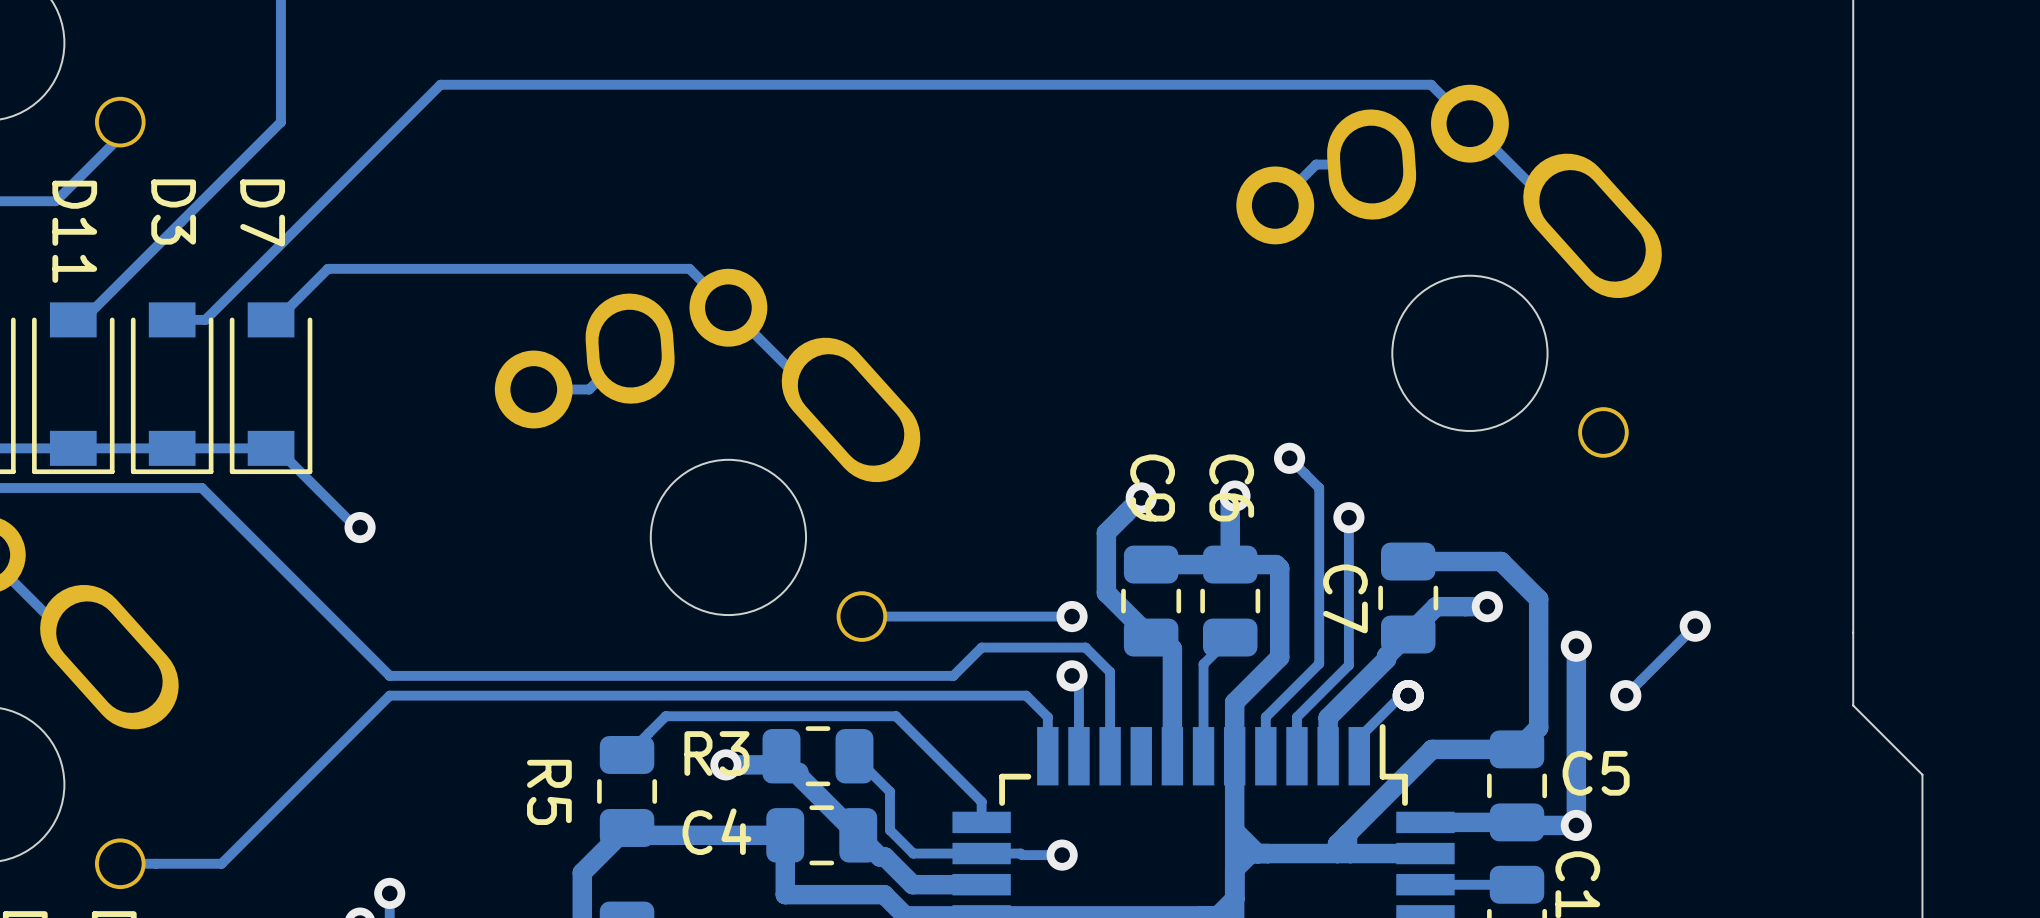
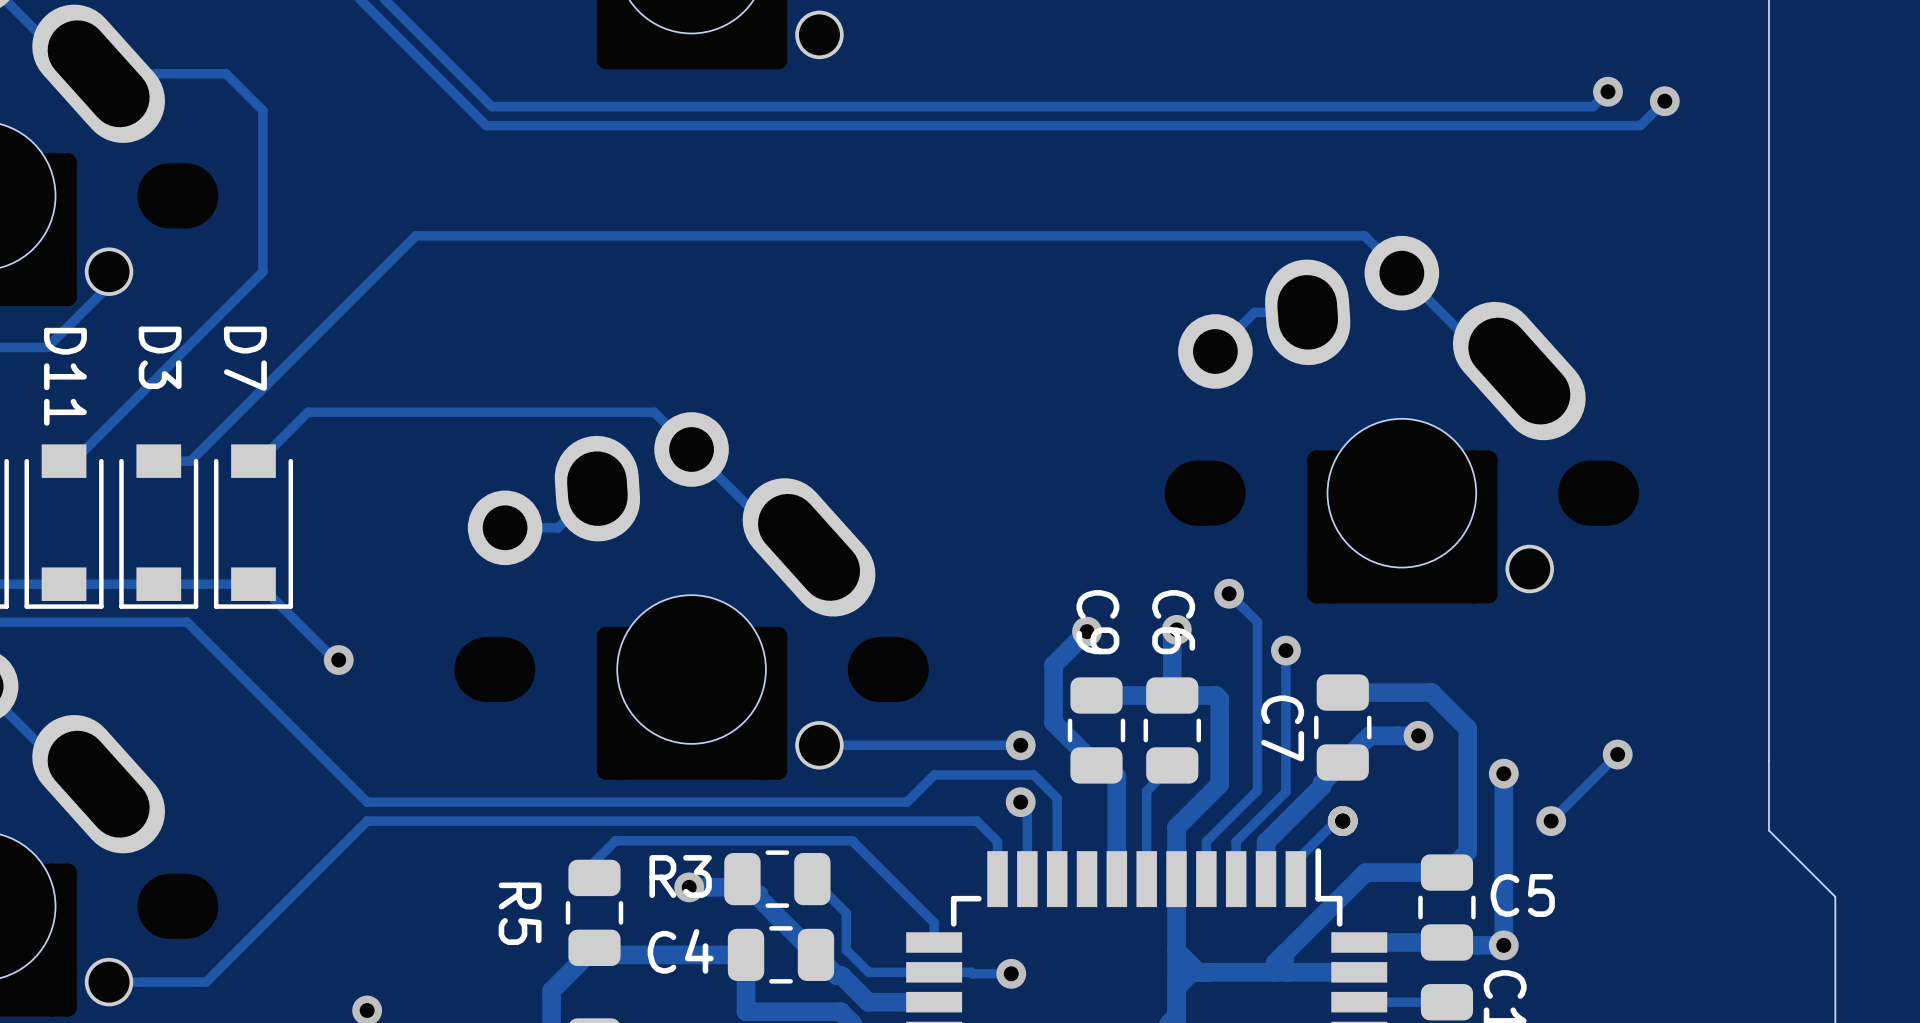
track: (665, 716) (627, 754) -> (631, 840) (615, 840) (594, 861)

